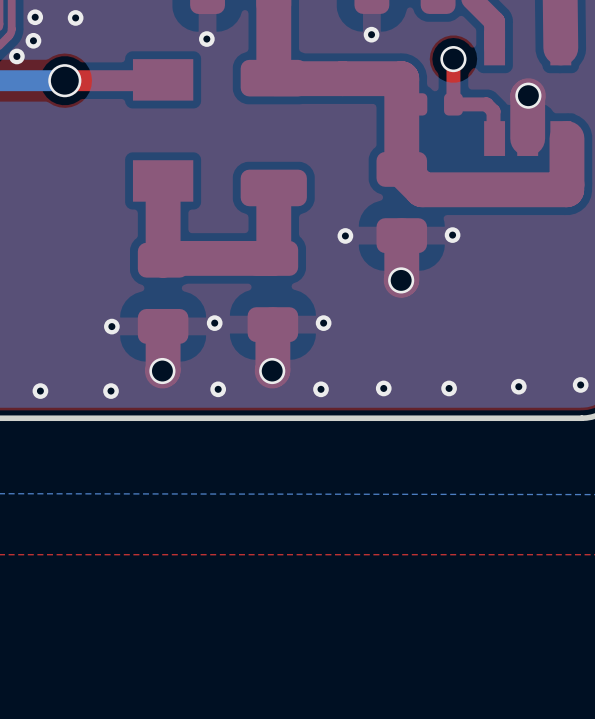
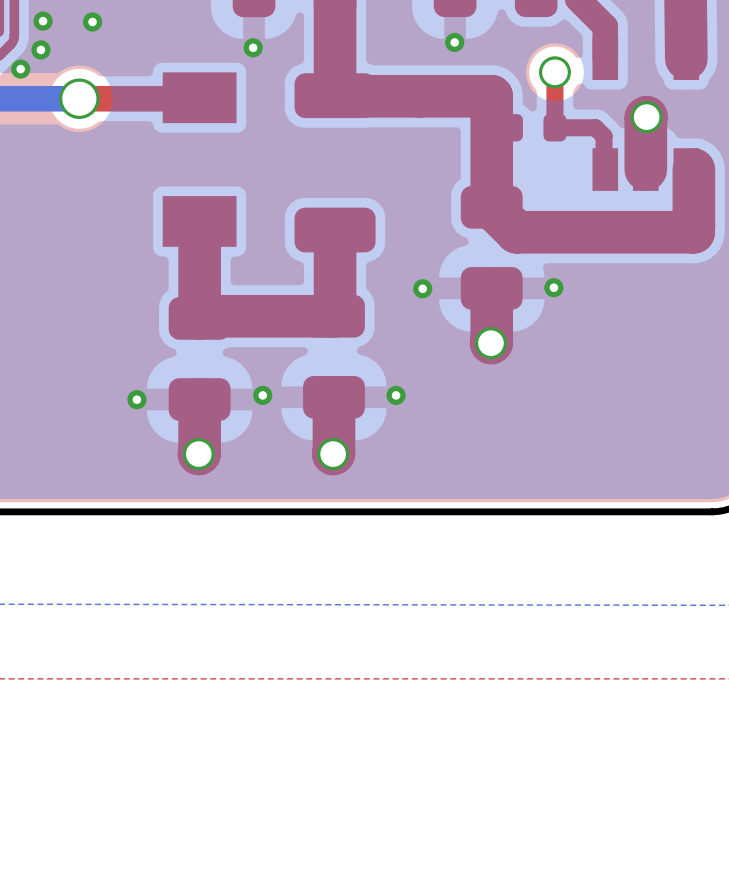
via: (580, 384) -> none
via: (518, 386) -> none
via: (383, 388) -> none
via: (449, 388) -> none
via: (218, 389) -> none
via: (321, 389) -> none
via: (40, 391) -> none
via: (111, 391) -> none

